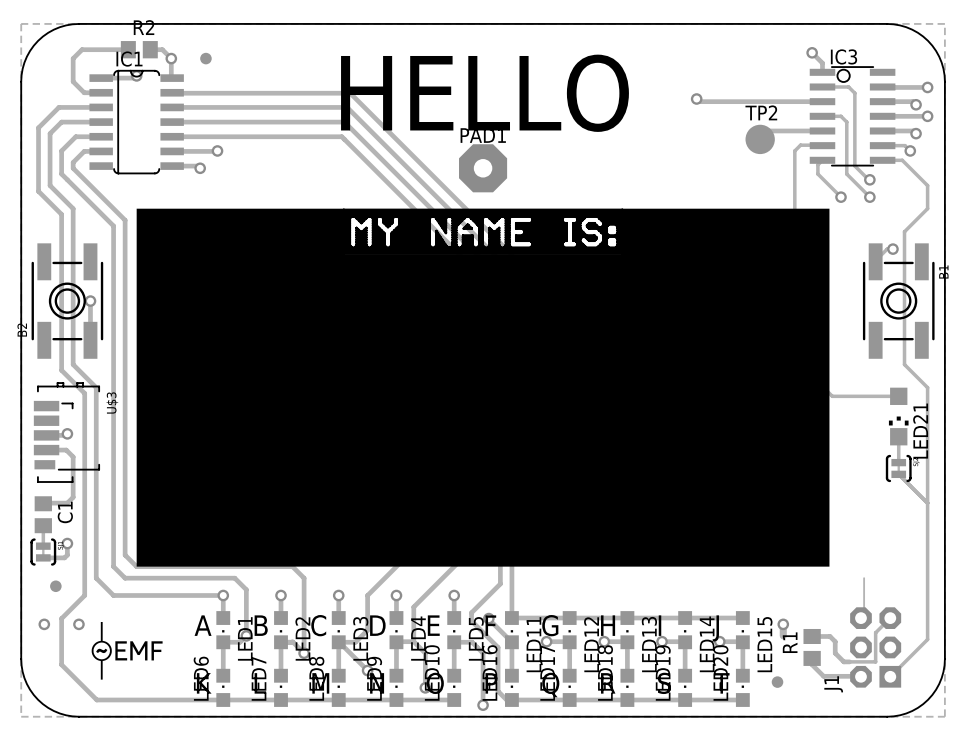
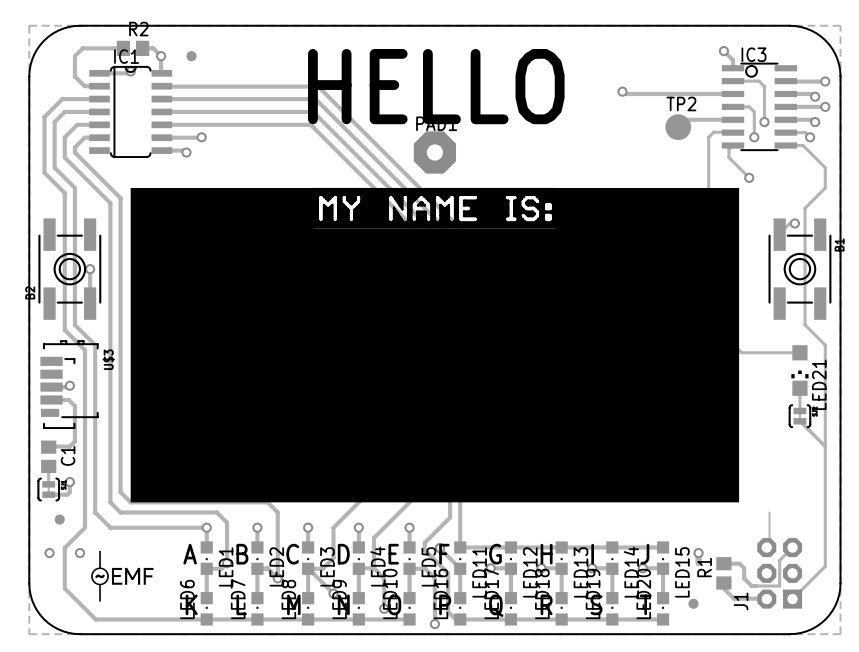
track: (848, 86) (854, 93) (854, 165) (869, 179) -> (755, 81) (758, 81) (764, 86) (764, 122)
via: none -> (764, 122)
track: (846, 150) (846, 174) (869, 197) -> none
via: none -> (754, 137)
via: (869, 179) -> none
via: (869, 197) -> none

